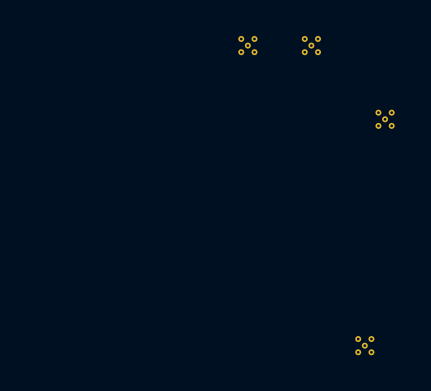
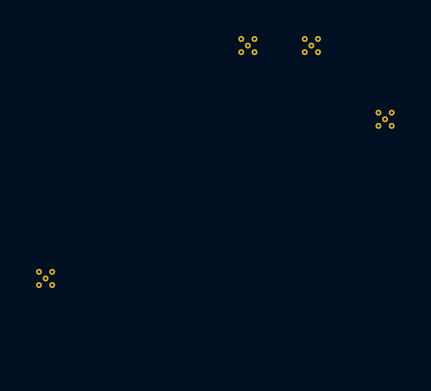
part position: (364, 345) -> (45, 278)

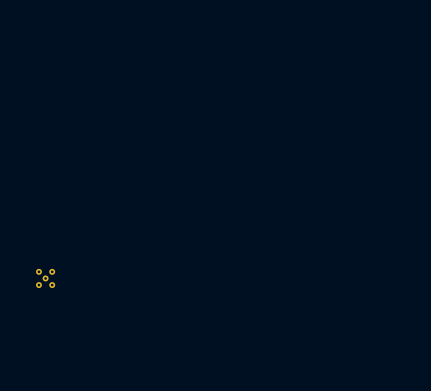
part: (247, 45) -> none
part: (311, 45) -> none
part: (385, 119) -> none

